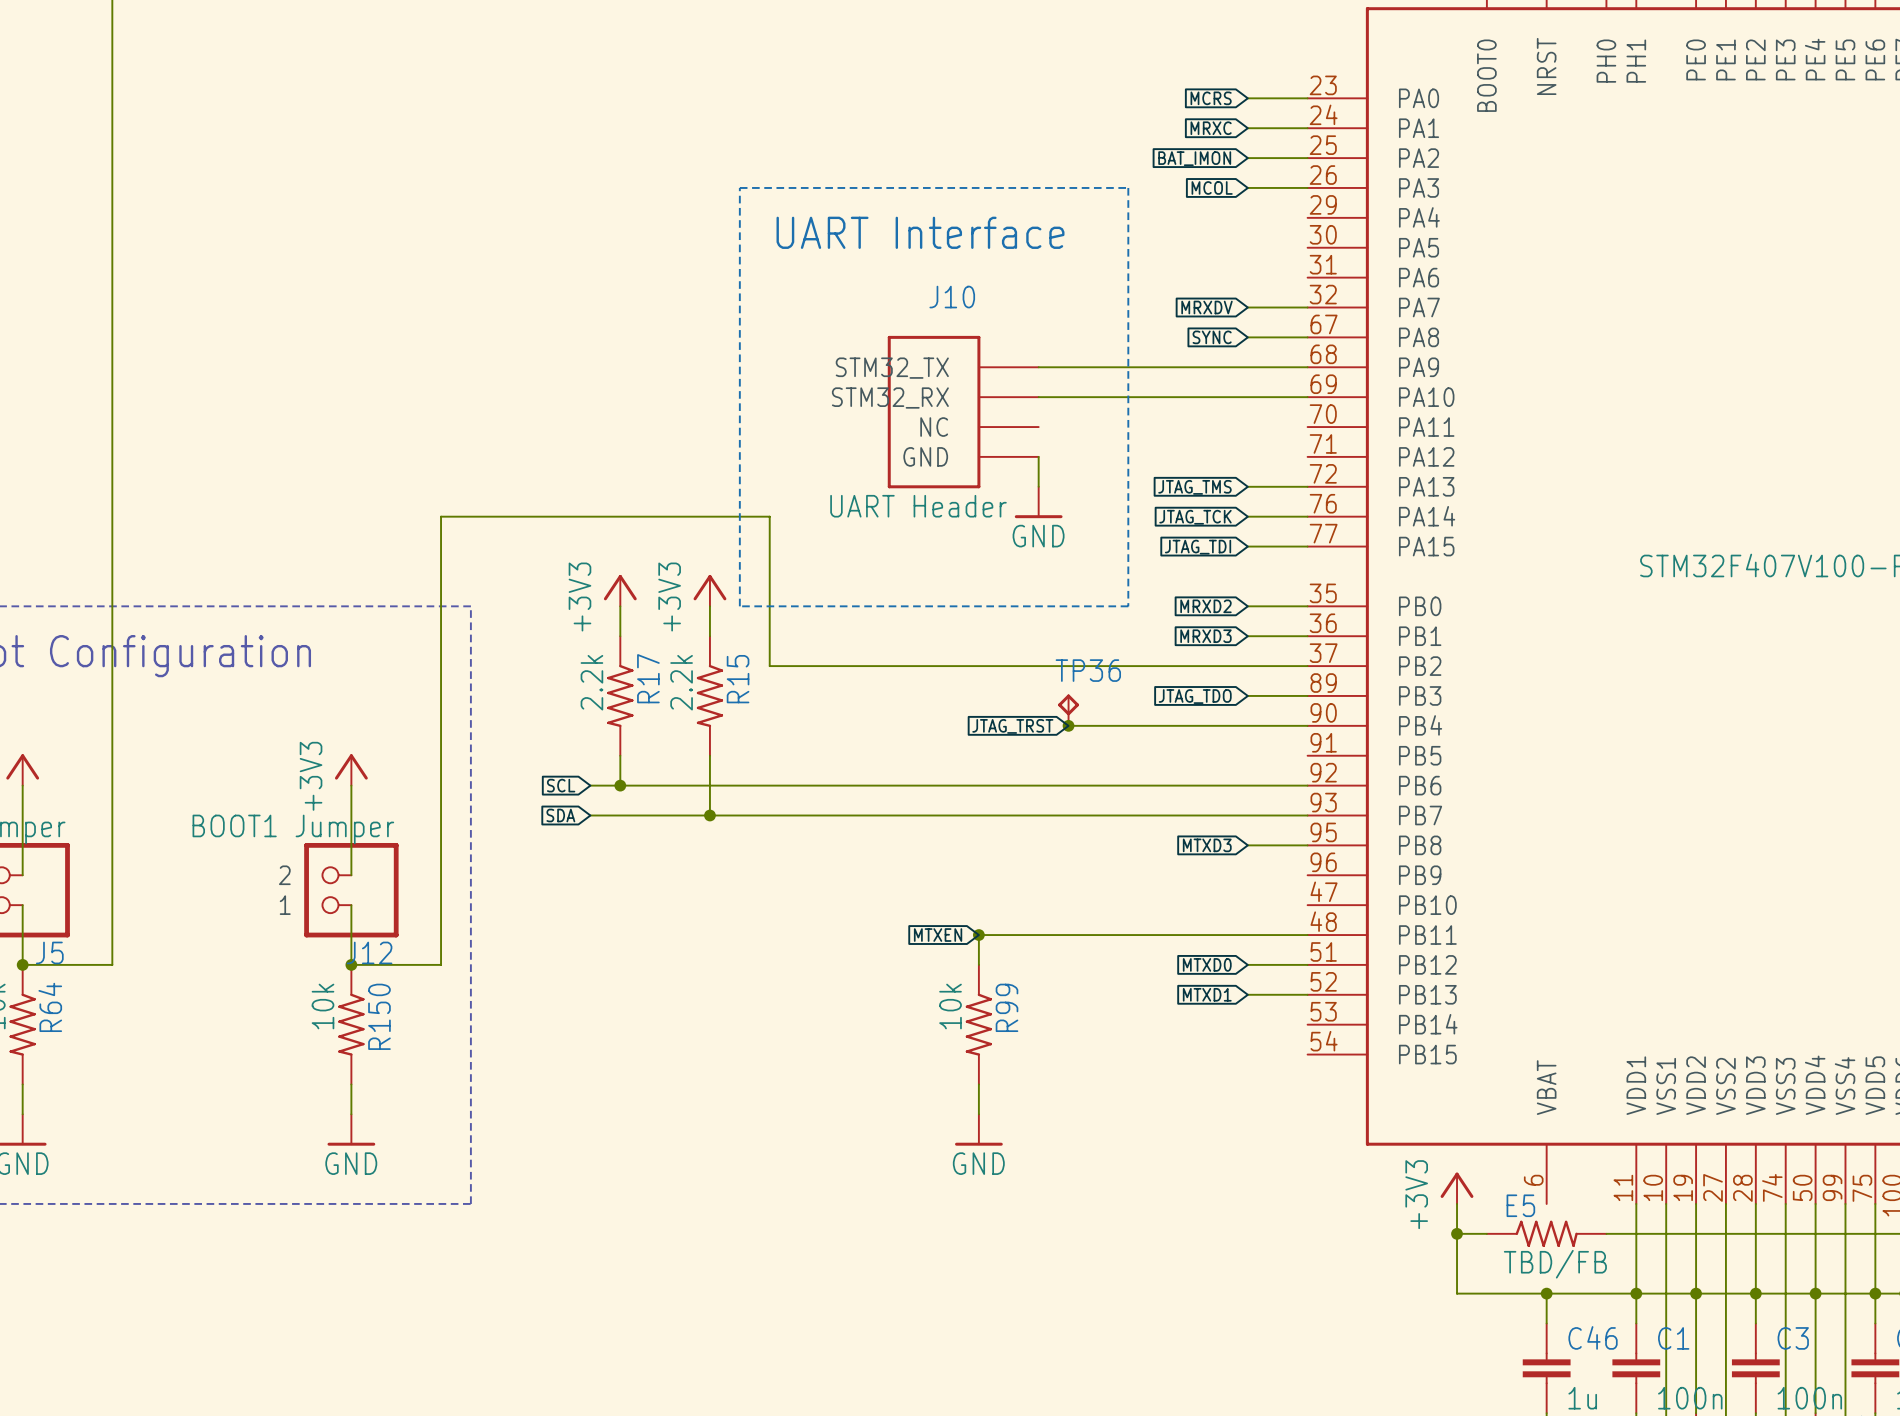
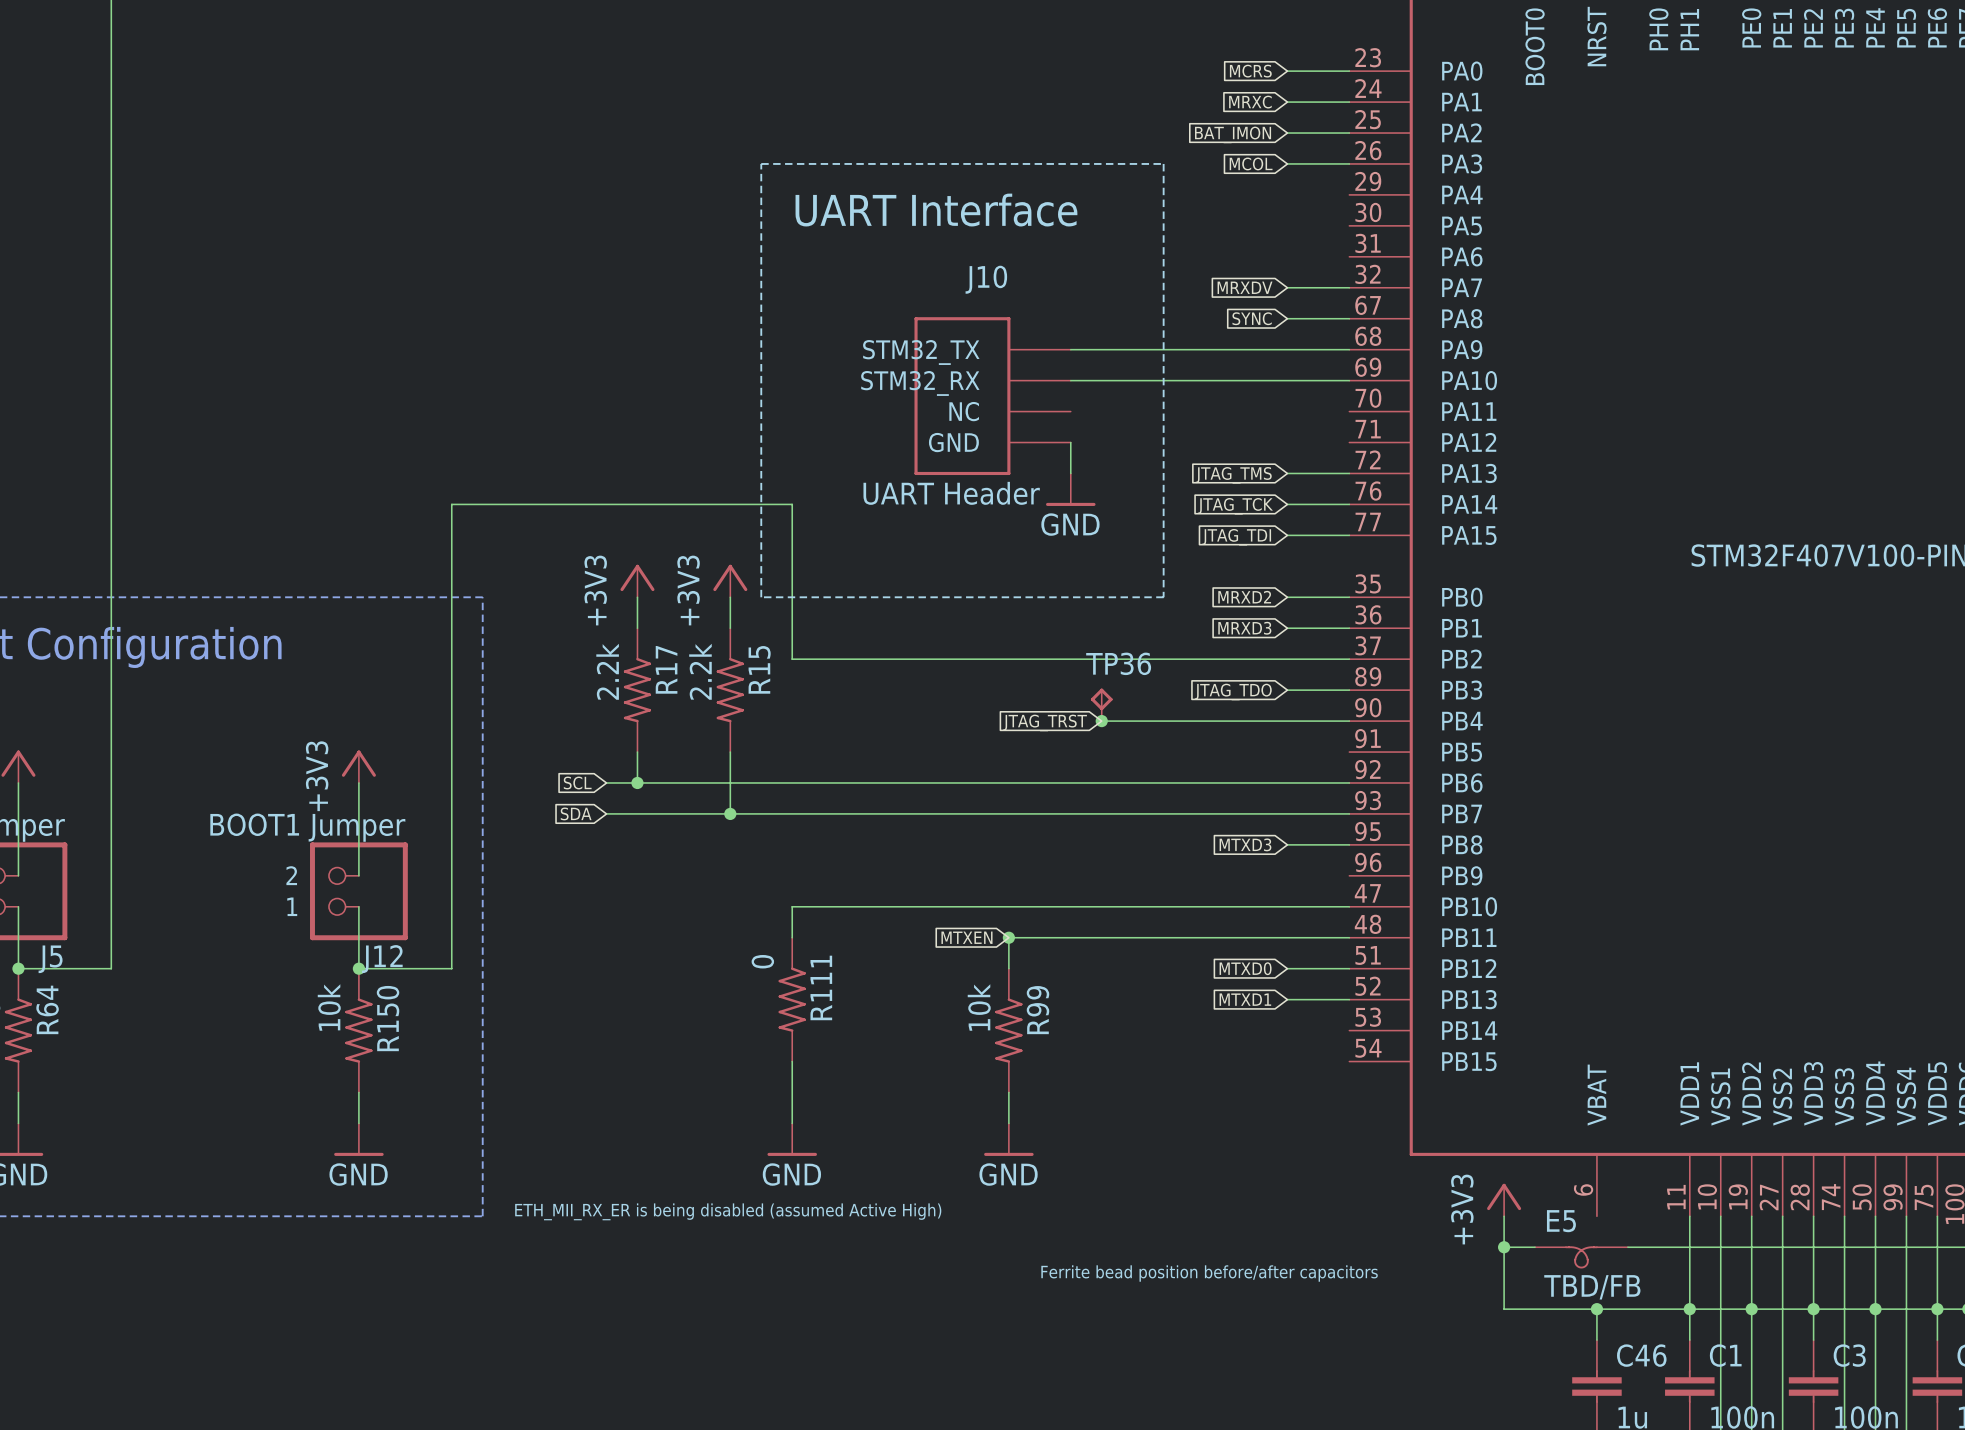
wire: none -> (1349, 906) (792, 906) (792, 937)
R111: none -> 0 (792, 999)
wire: none -> (792, 1061) (792, 1123)
power symbol: none -> GND (792, 1139)
text: none -> ETH_MII_RX_ER is being disabled (assumed Active High) (728, 1211)
E5 symbol: [1486, 1220, 1607, 1247] -> [1535, 1246, 1628, 1269]
text: none -> Ferrite bead position before/after capacitors (1209, 1273)

